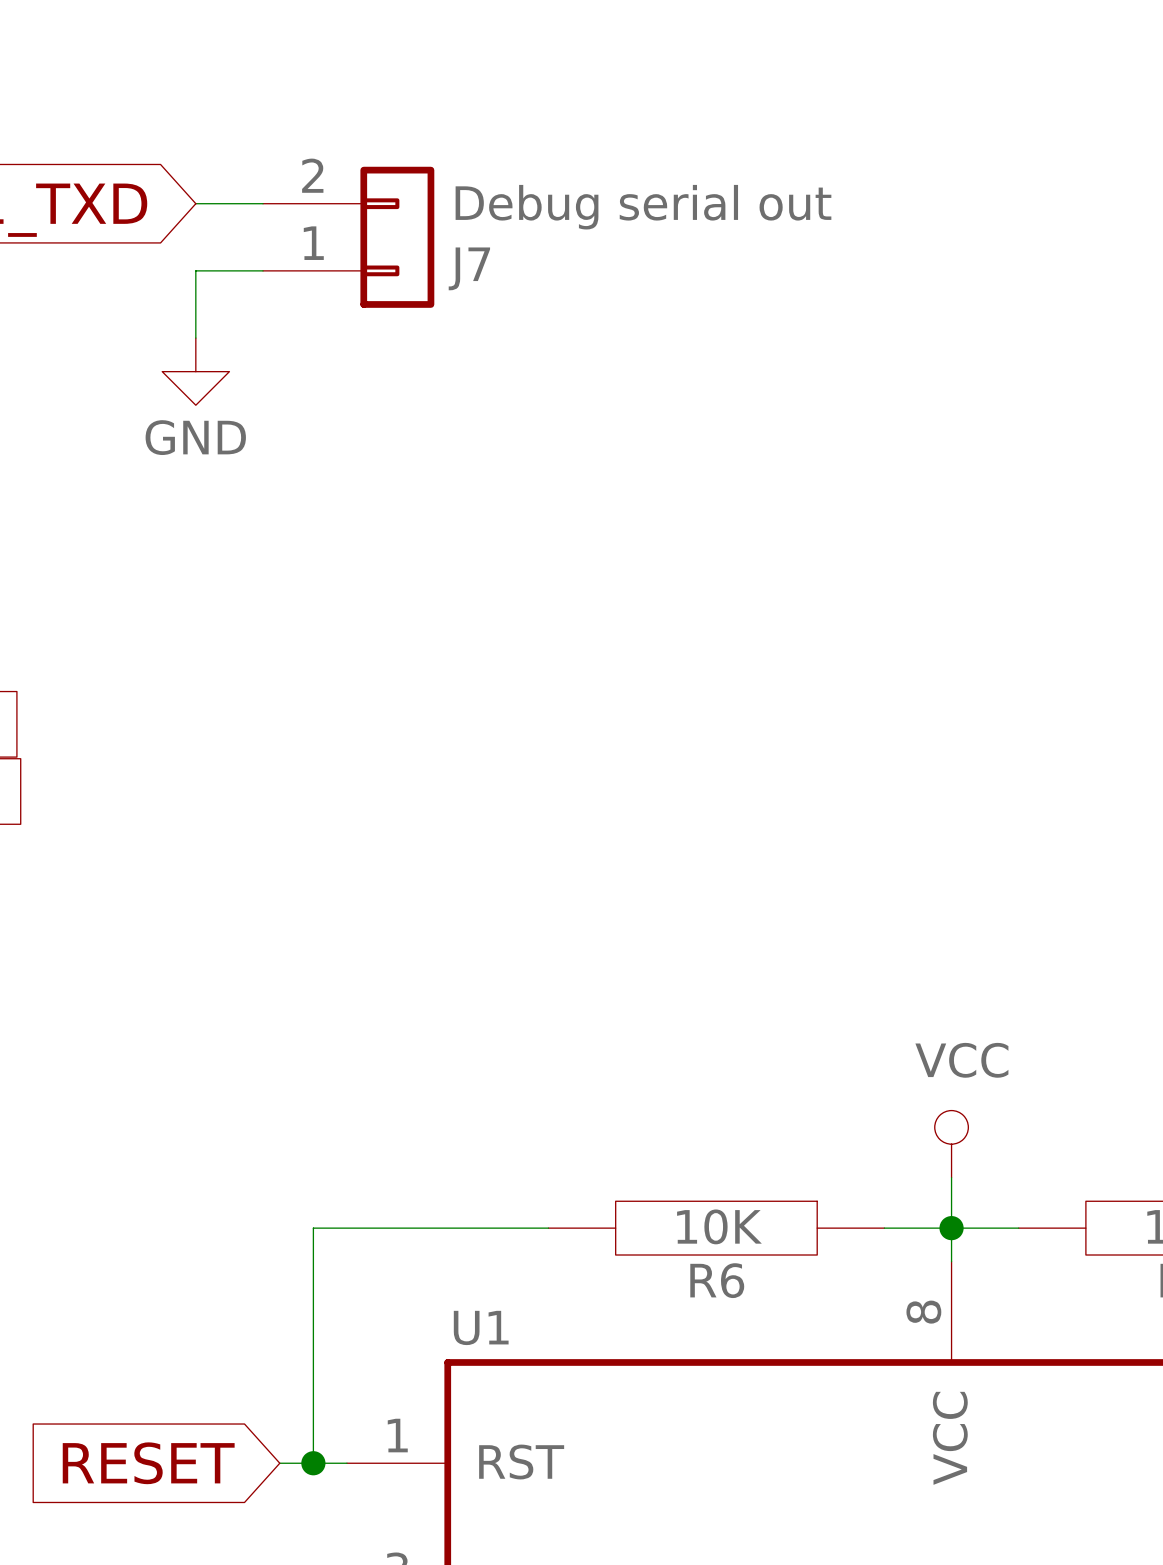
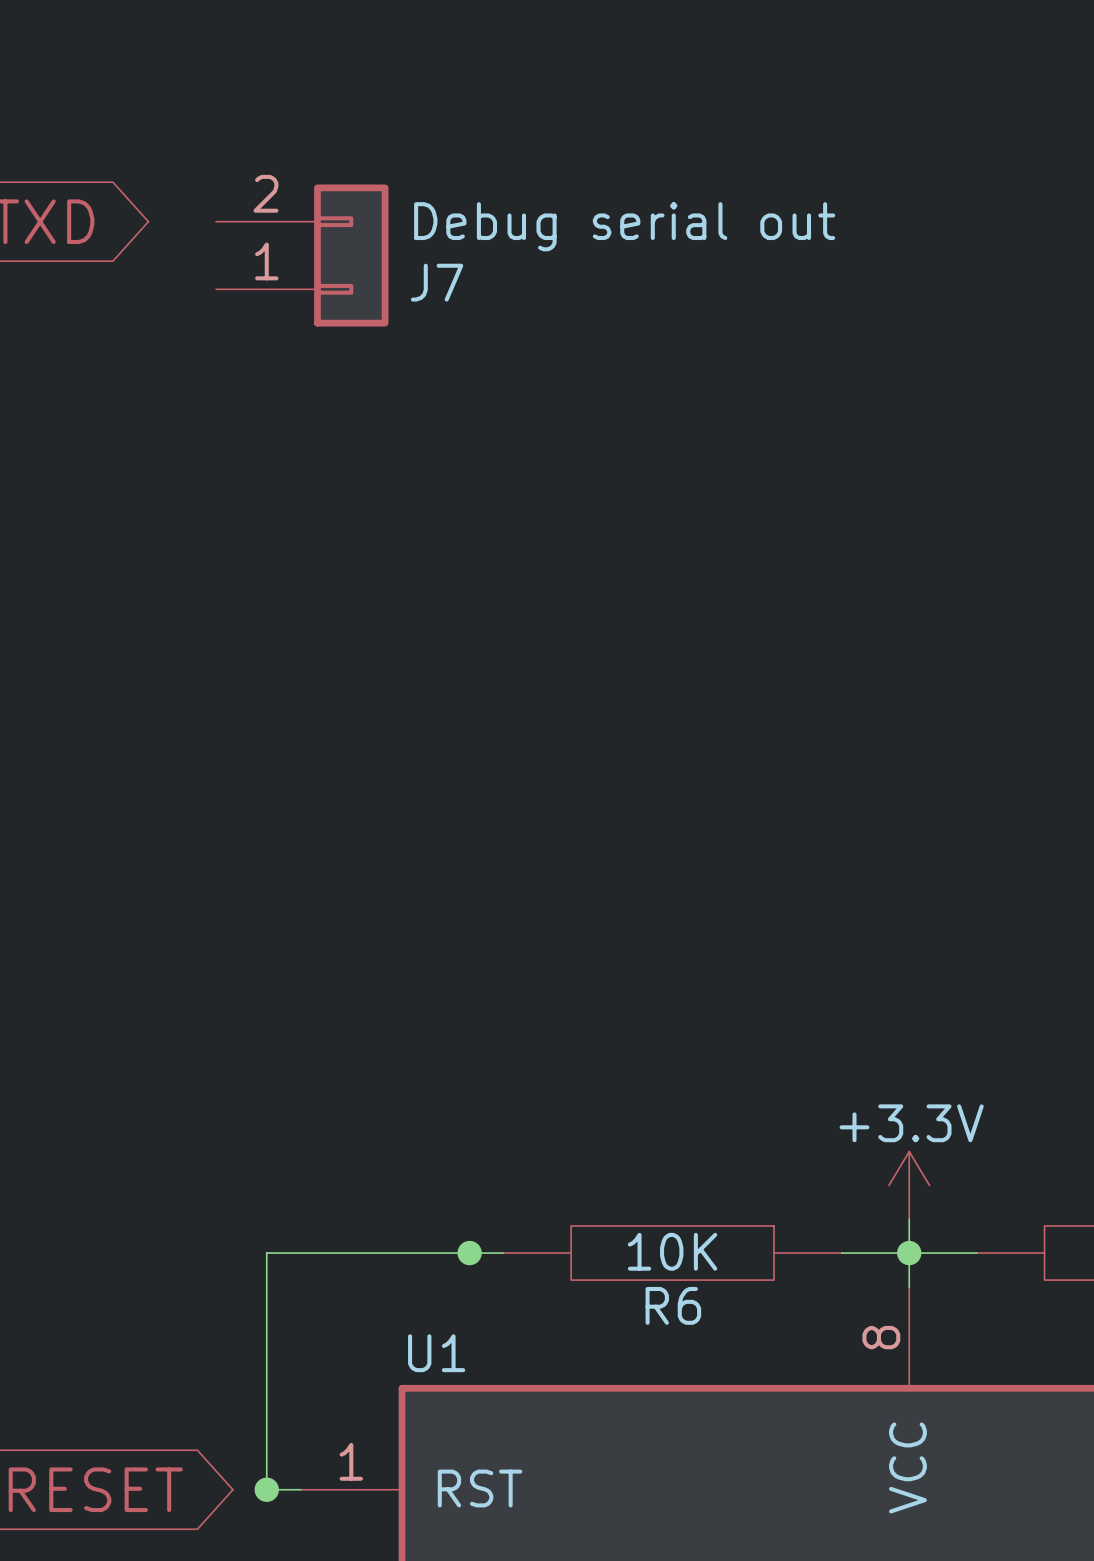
wire: (195, 203) (263, 203) -> none
wire: (263, 270) (195, 270) (195, 338) -> none
power symbol: GND (195, 371) -> none
power symbol: VCC (951, 1144) -> +3.3V (909, 1185)
junction: none -> (469, 1253)
wire: (279, 1463) (313, 1463) -> none

